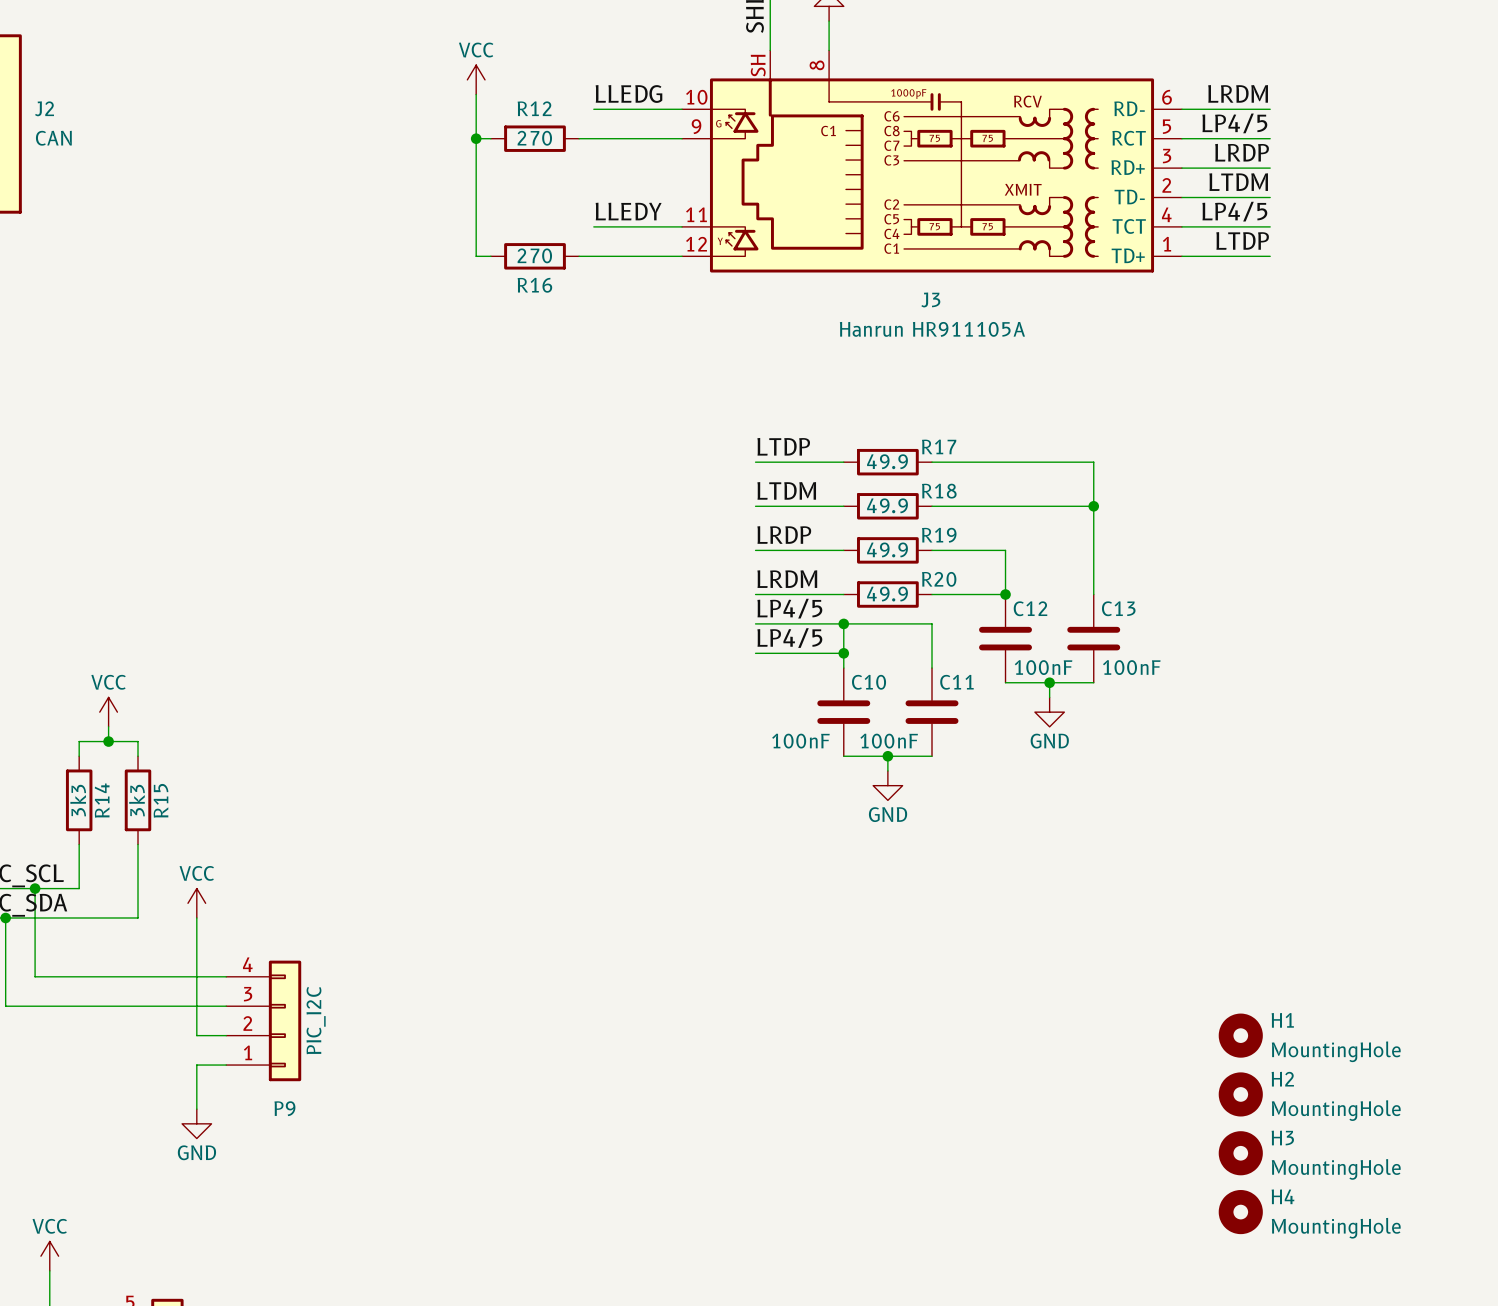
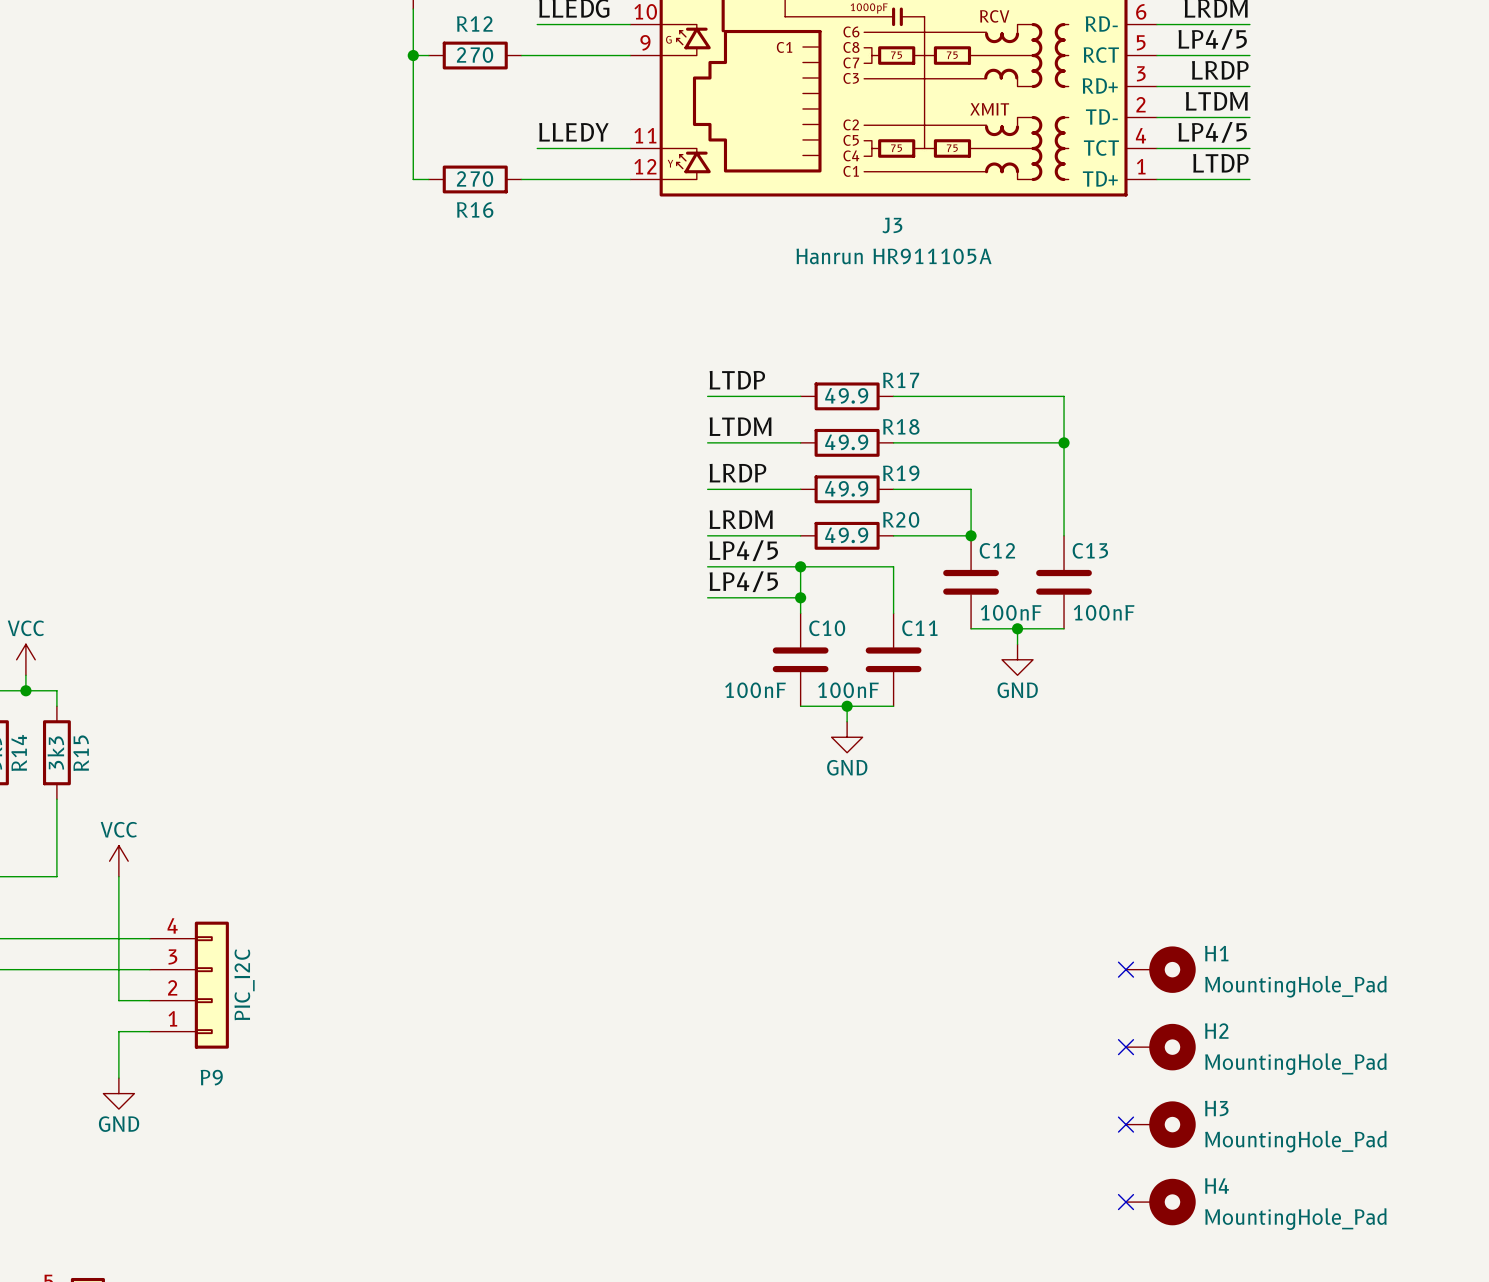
no-connect mark: none -> (1125, 969)
H1 symbol: [1218, 1013, 1263, 1058] -> [1125, 946, 1196, 993]
H1 value: MountingHole (1336, 1051) -> MountingHole_Pad (1295, 986)
H2 symbol: [1218, 1072, 1263, 1117] -> [1125, 1023, 1196, 1071]
no-connect mark: none -> (1125, 1047)
H2 value: MountingHole (1336, 1110) -> MountingHole_Pad (1295, 1064)
H3 symbol: [1218, 1131, 1263, 1176] -> [1125, 1101, 1196, 1148]
no-connect mark: none -> (1125, 1124)
H3 value: MountingHole (1336, 1169) -> MountingHole_Pad (1295, 1141)
H4 symbol: [1218, 1190, 1263, 1235] -> [1125, 1178, 1196, 1226]
no-connect mark: none -> (1125, 1202)
H4 value: MountingHole (1336, 1228) -> MountingHole_Pad (1295, 1219)

